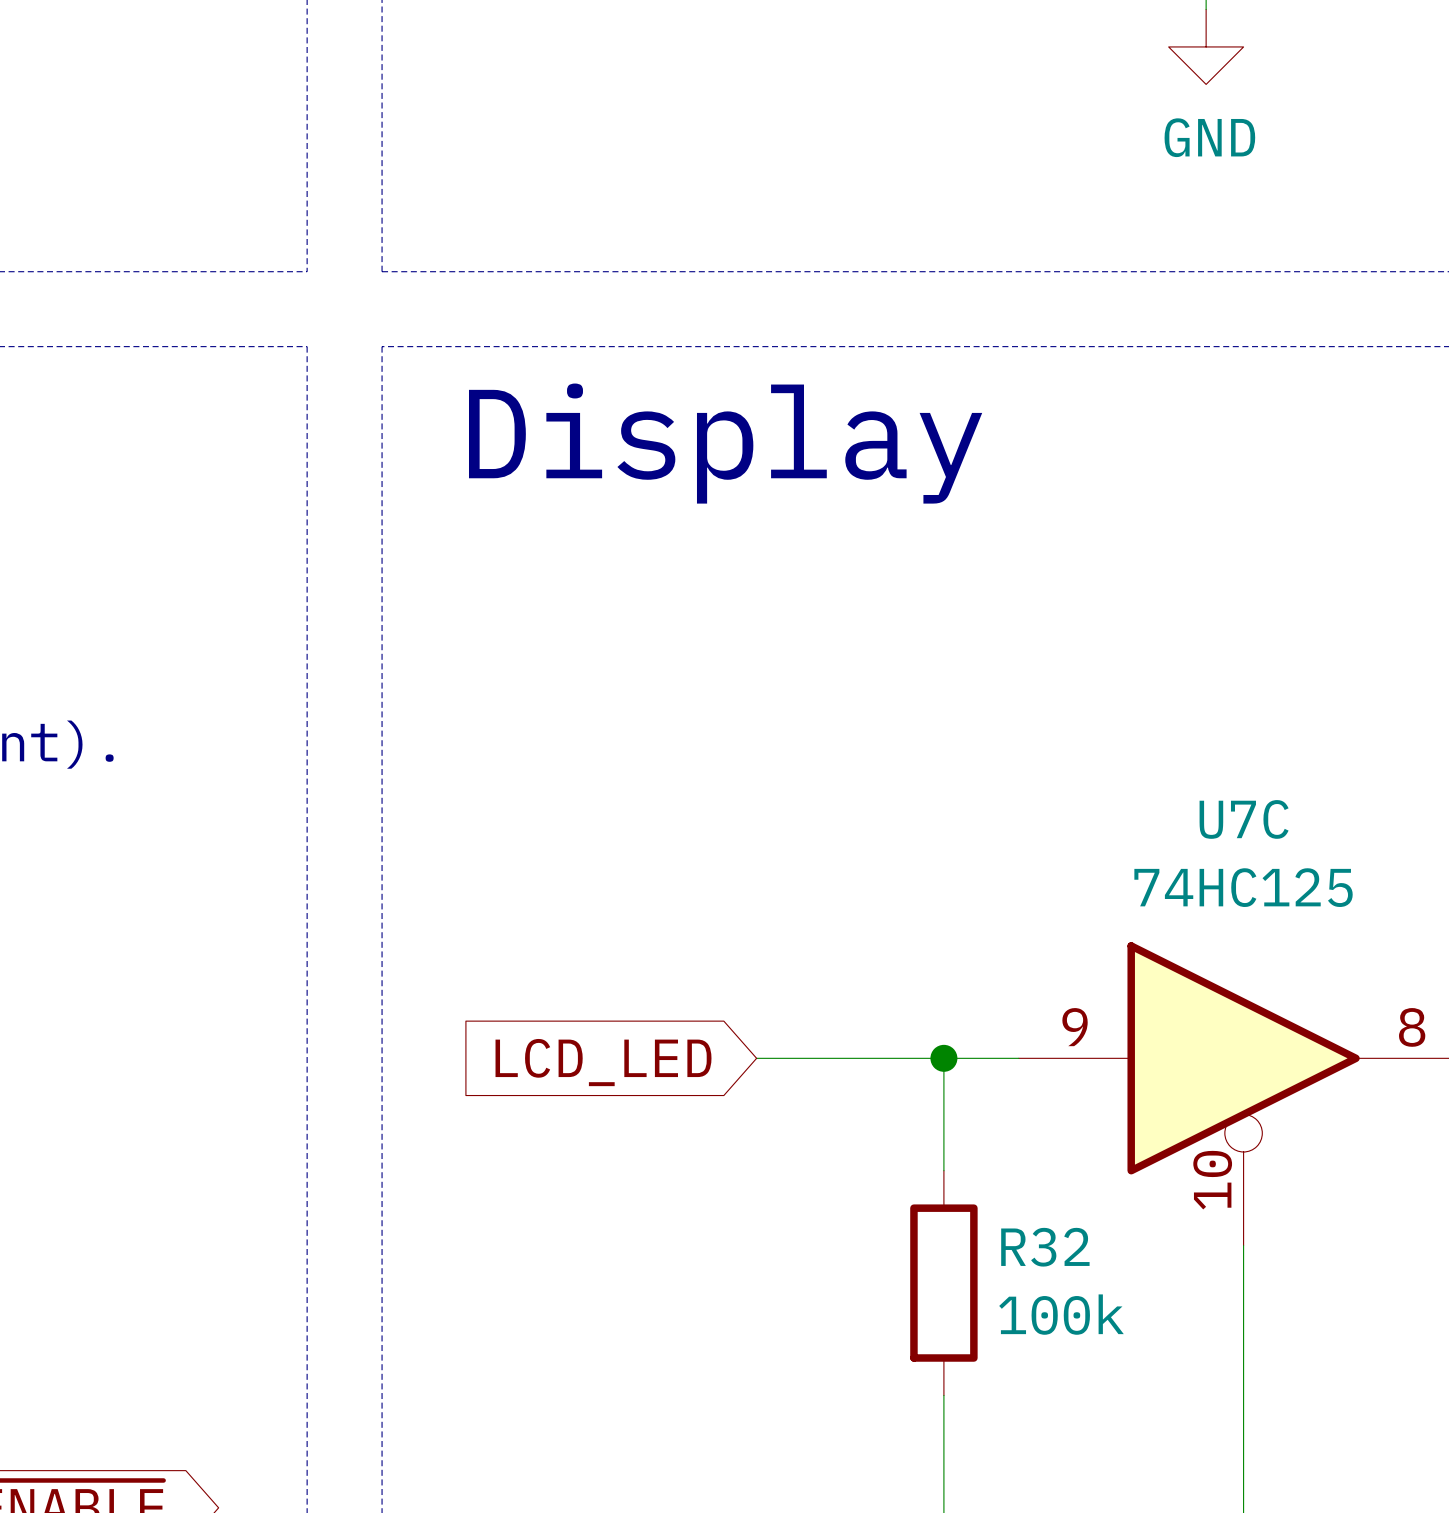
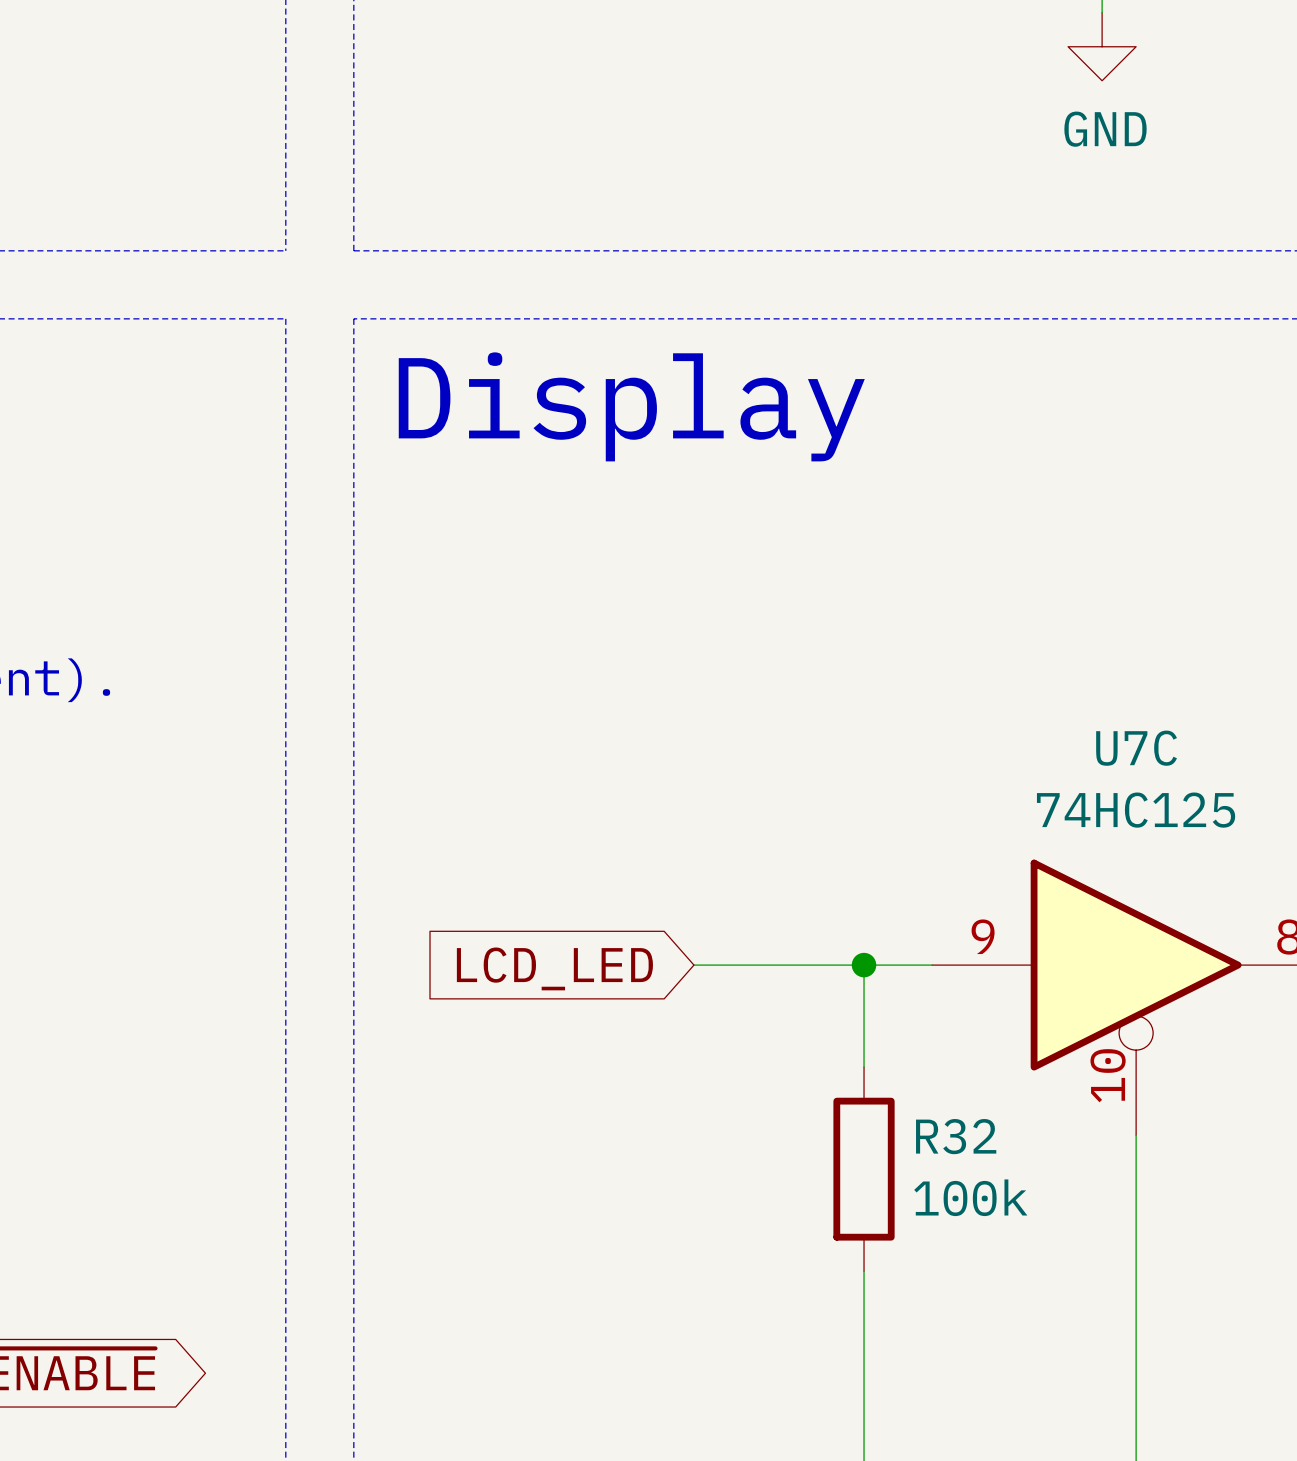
text position: Display (725, 443) -> Display (631, 406)

